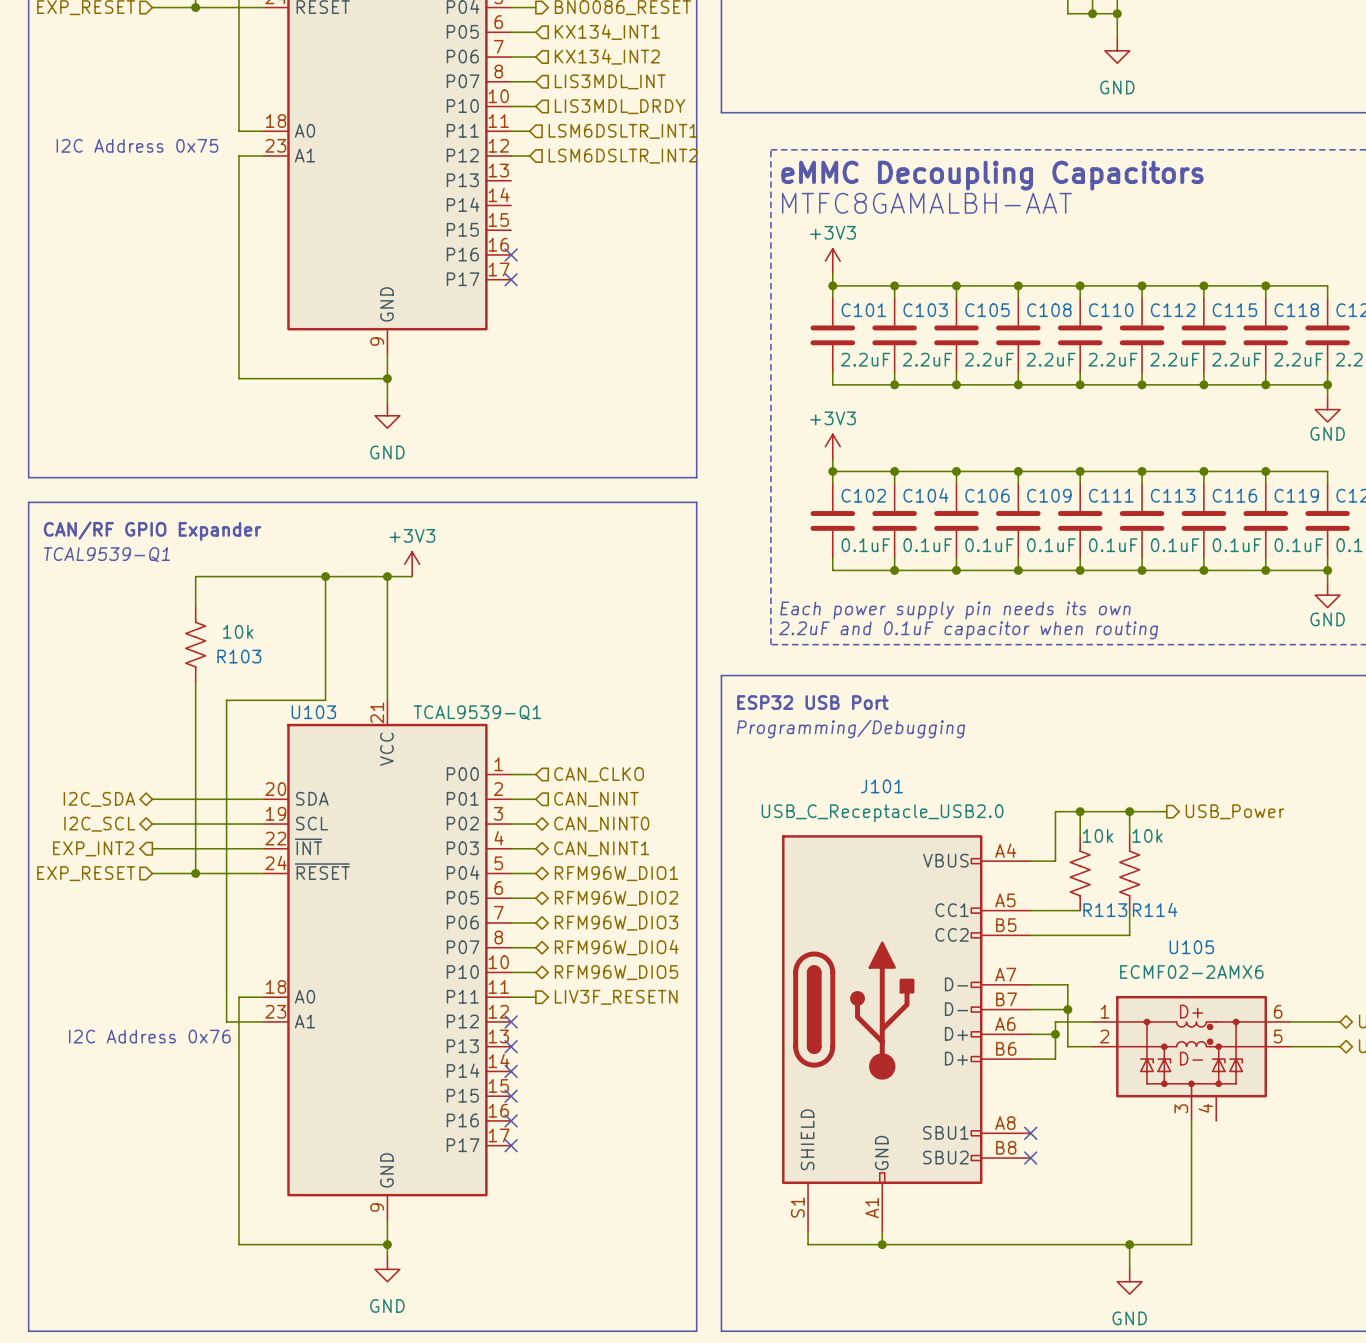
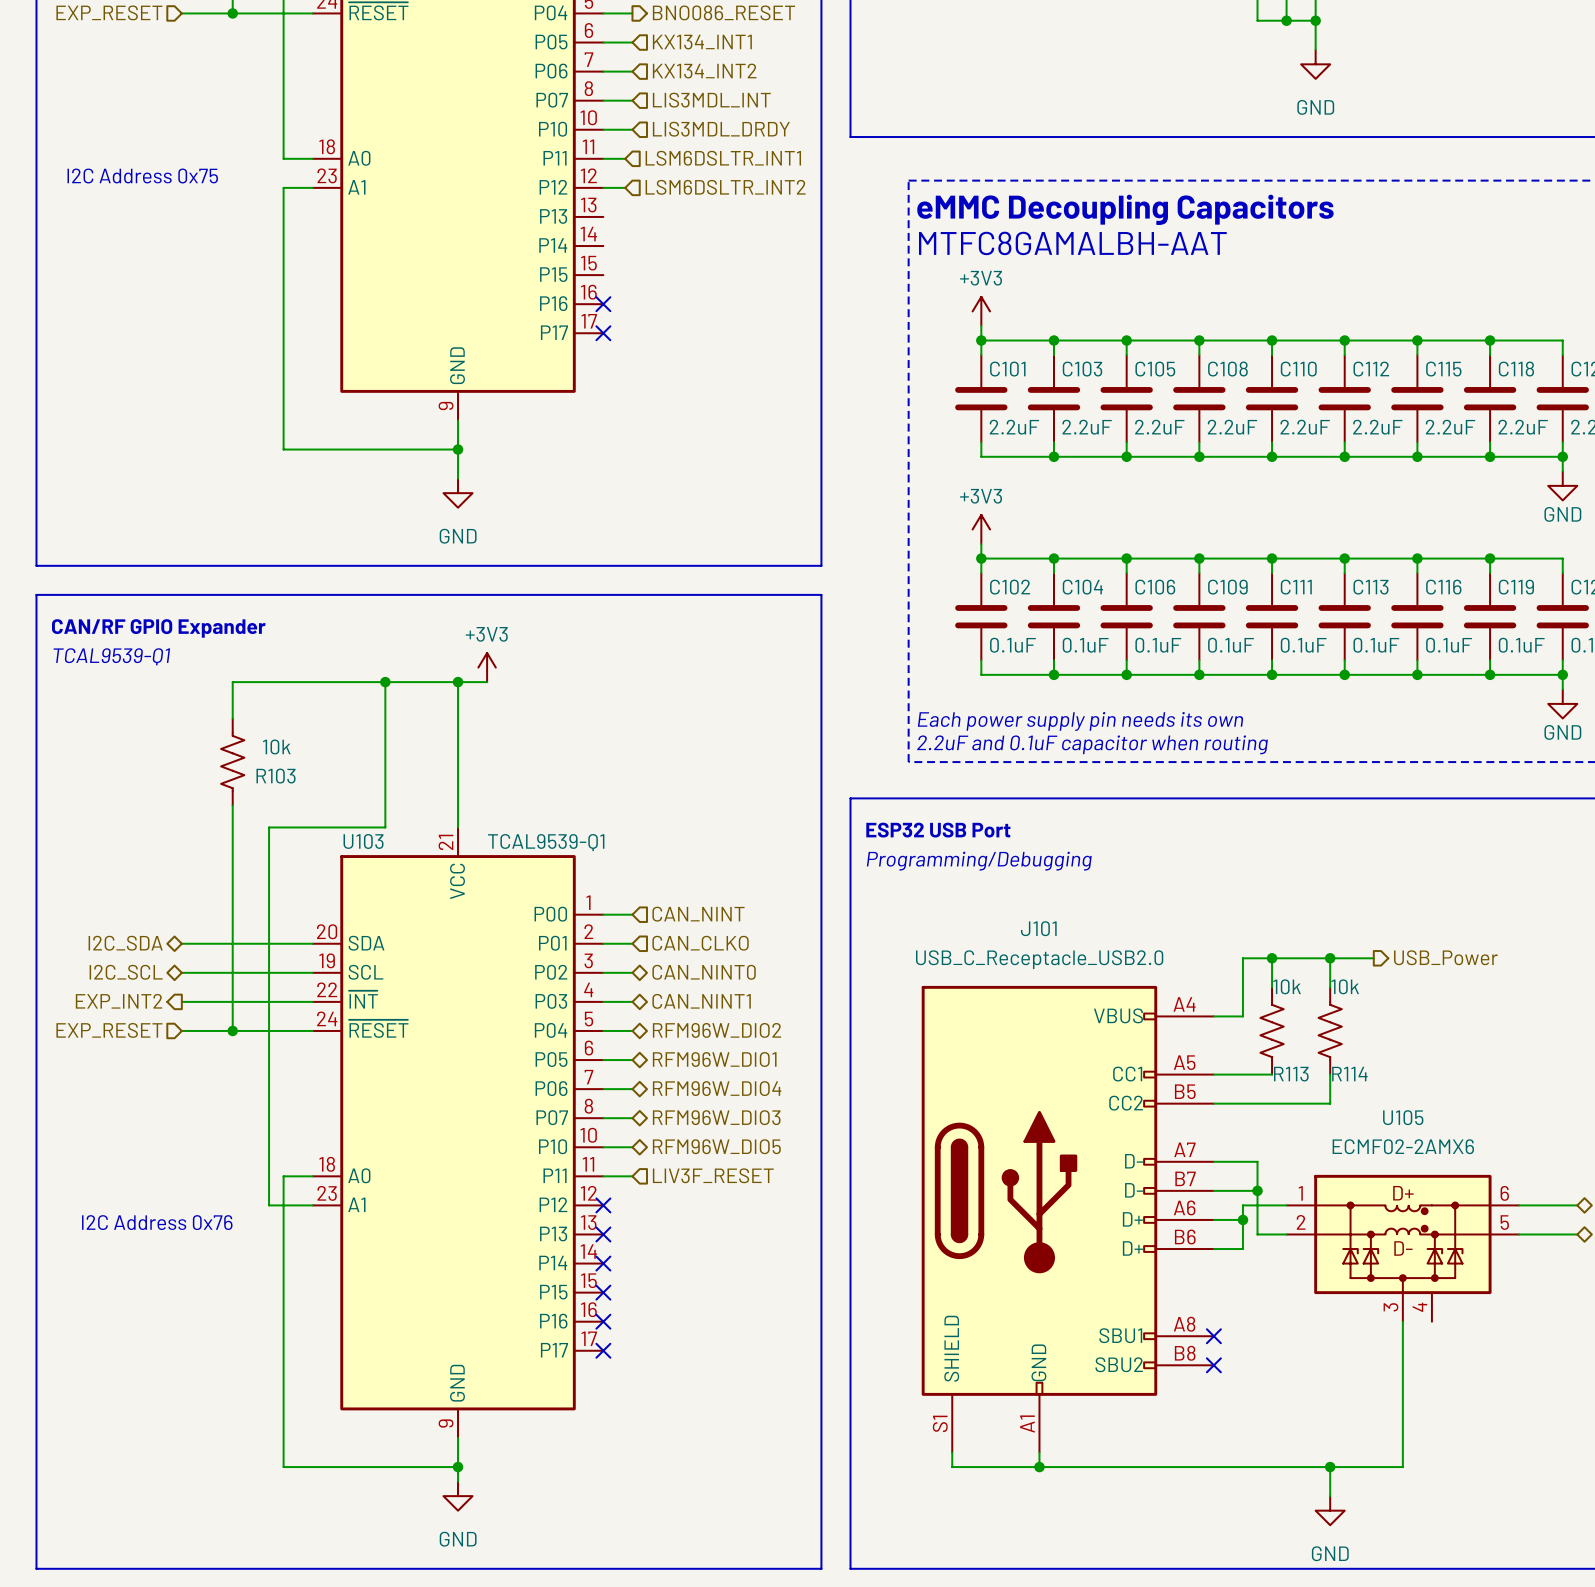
hierarchical label: CAN_CLKO (599, 774) -> CAN_NINT (698, 914)
hierarchical label: CAN_NINT (596, 799) -> CAN_CLKO (700, 943)
hierarchical label: RFM96W_DIO1 (616, 873) -> RFM96W_DIO2 (716, 1030)
hierarchical label: RFM96W_DIO2 (616, 898) -> RFM96W_DIO1 (714, 1059)
hierarchical label: RFM96W_DIO3 (616, 923) -> RFM96W_DIO4 (717, 1088)
hierarchical label: RFM96W_DIO4 (616, 947) -> RFM96W_DIO3 (716, 1117)
hierarchical label shape: output (616, 997) -> input (713, 1175)
hierarchical label: LIV3F_RESETN (616, 997) -> LIV3F_RESET (713, 1175)

